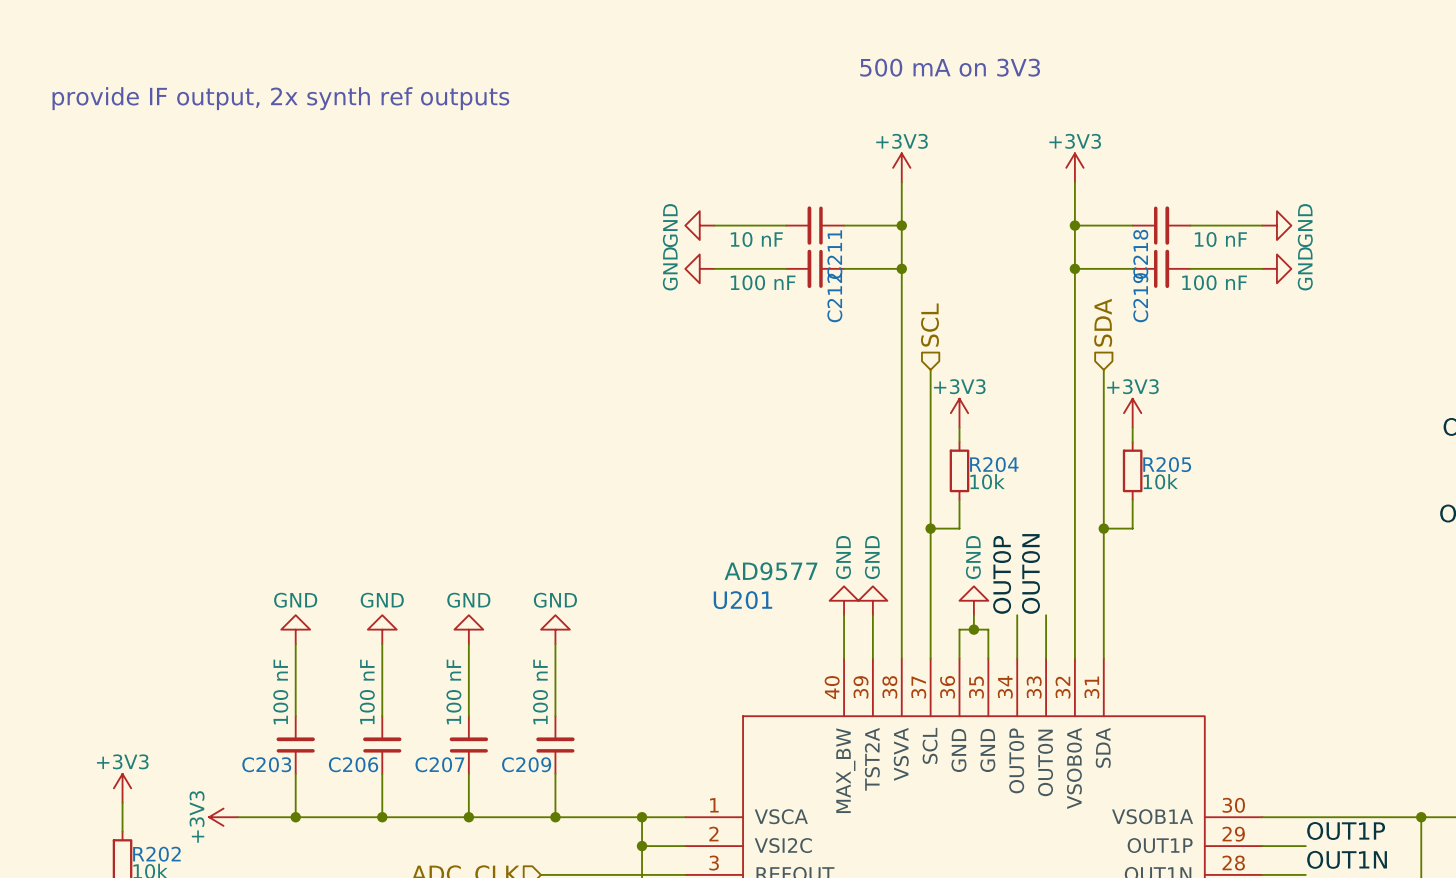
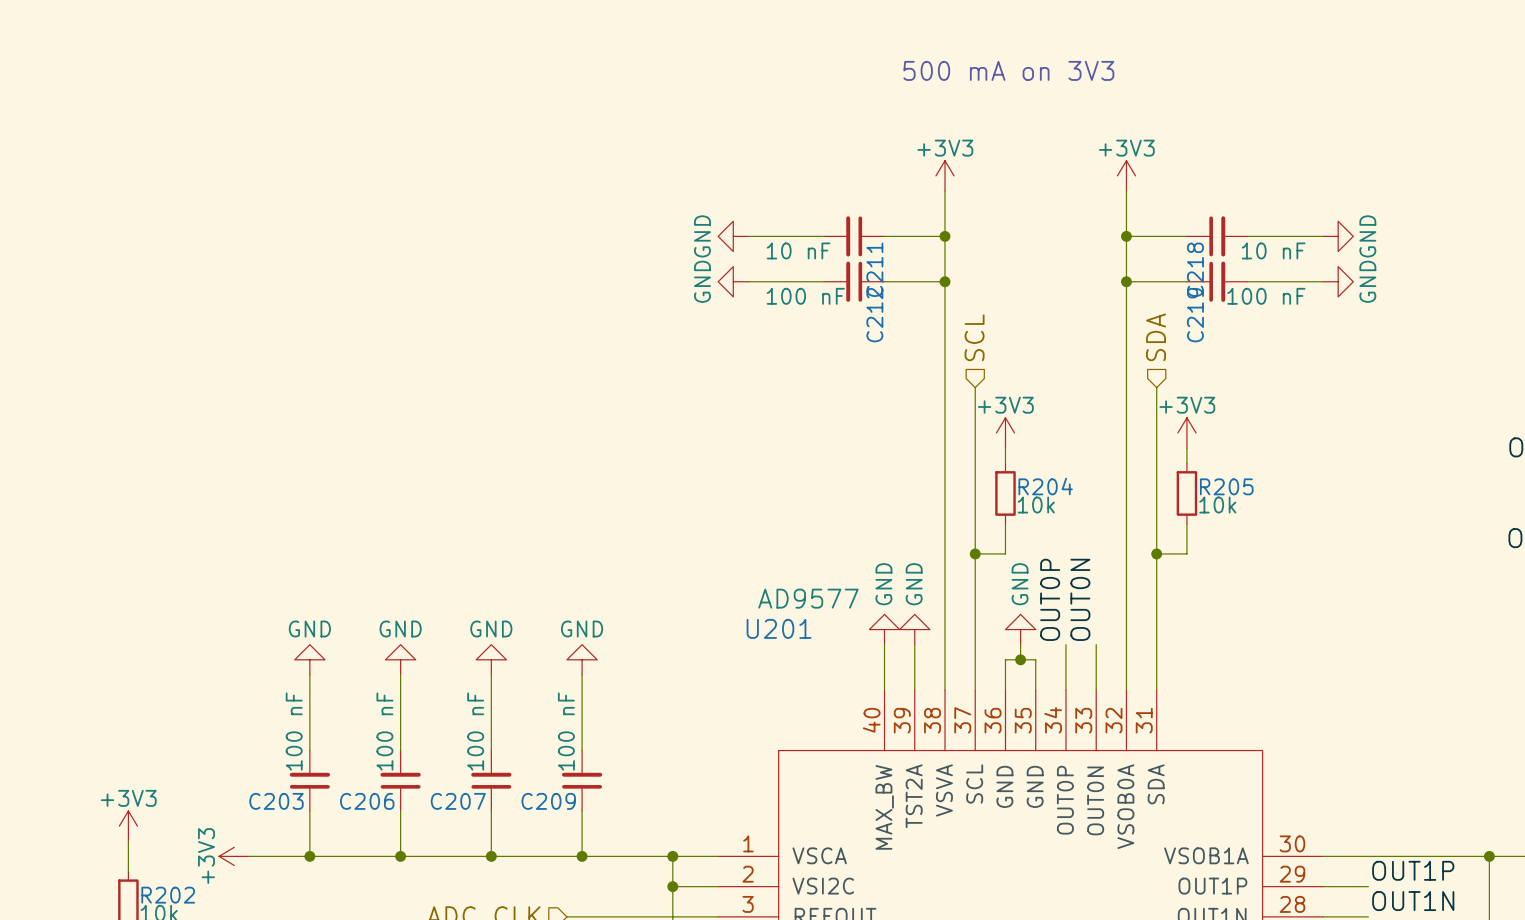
text: provide IF output, 2x synth ref outputs (280, 98) -> none

